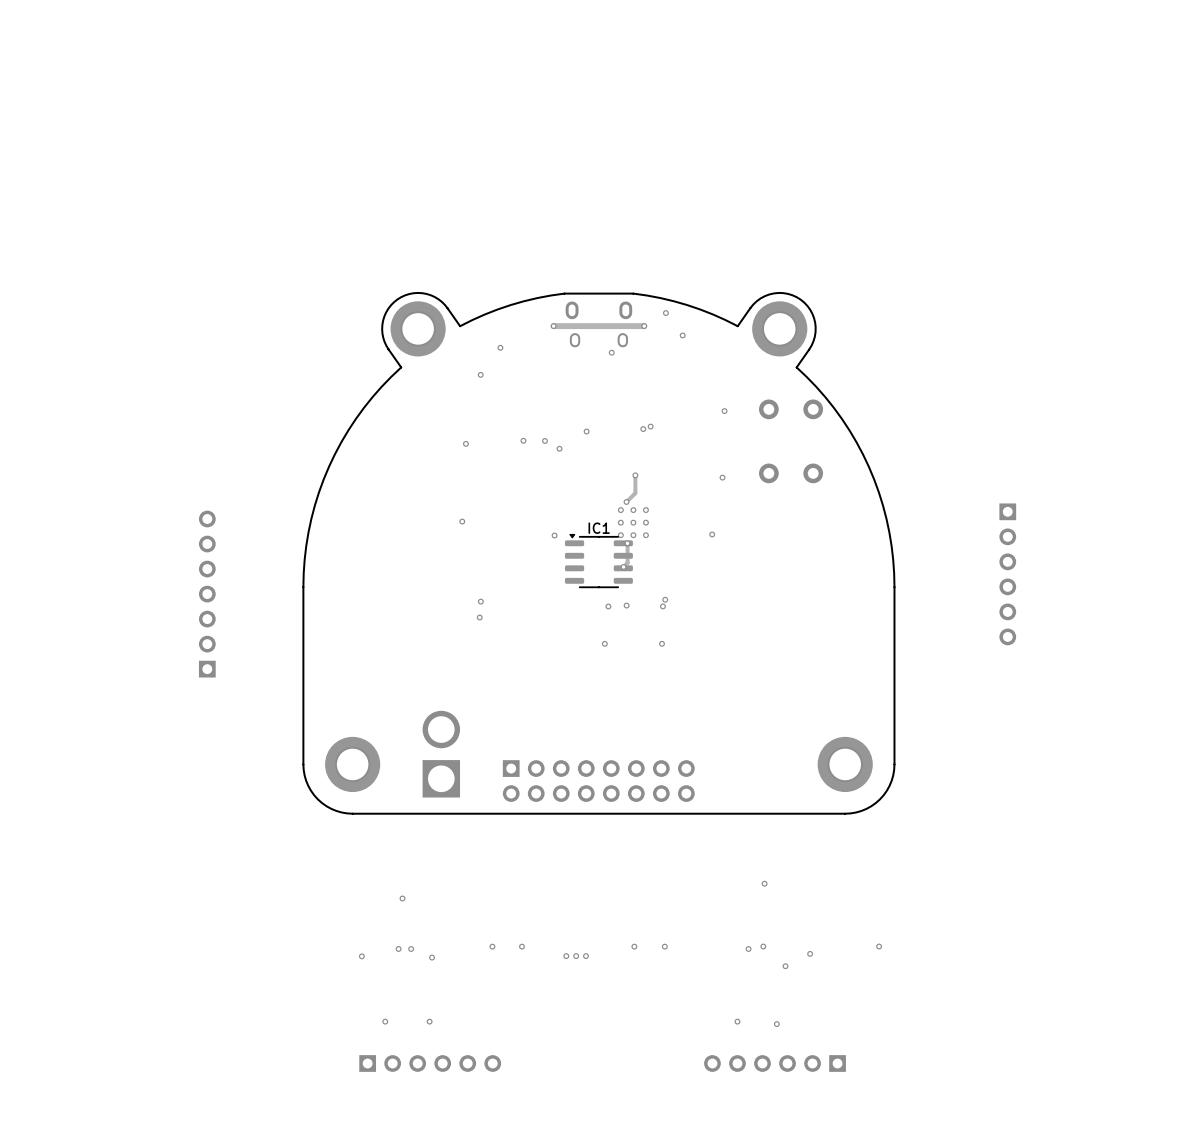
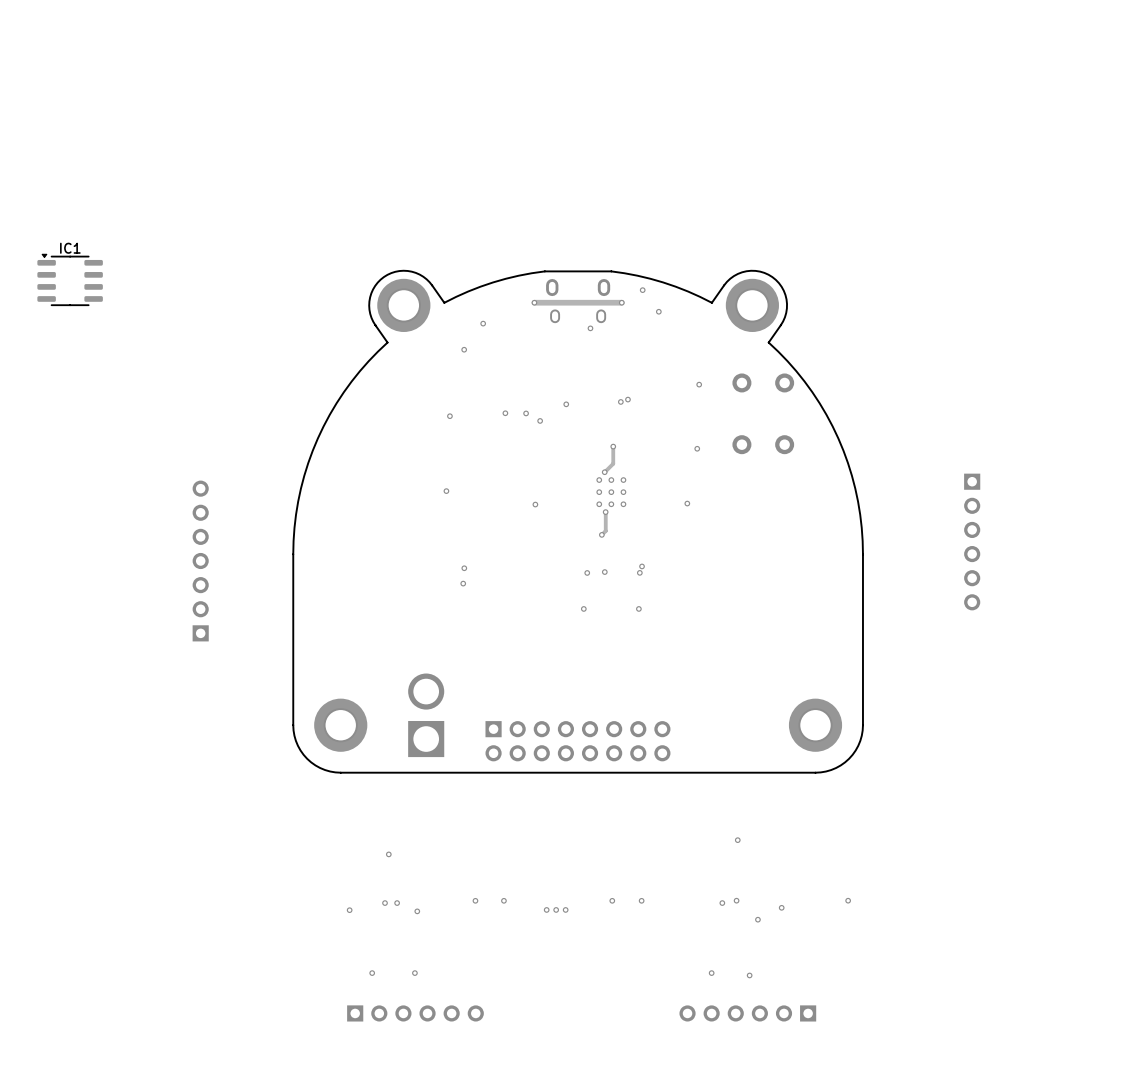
IC1 position: (598, 560) -> (70, 279)

